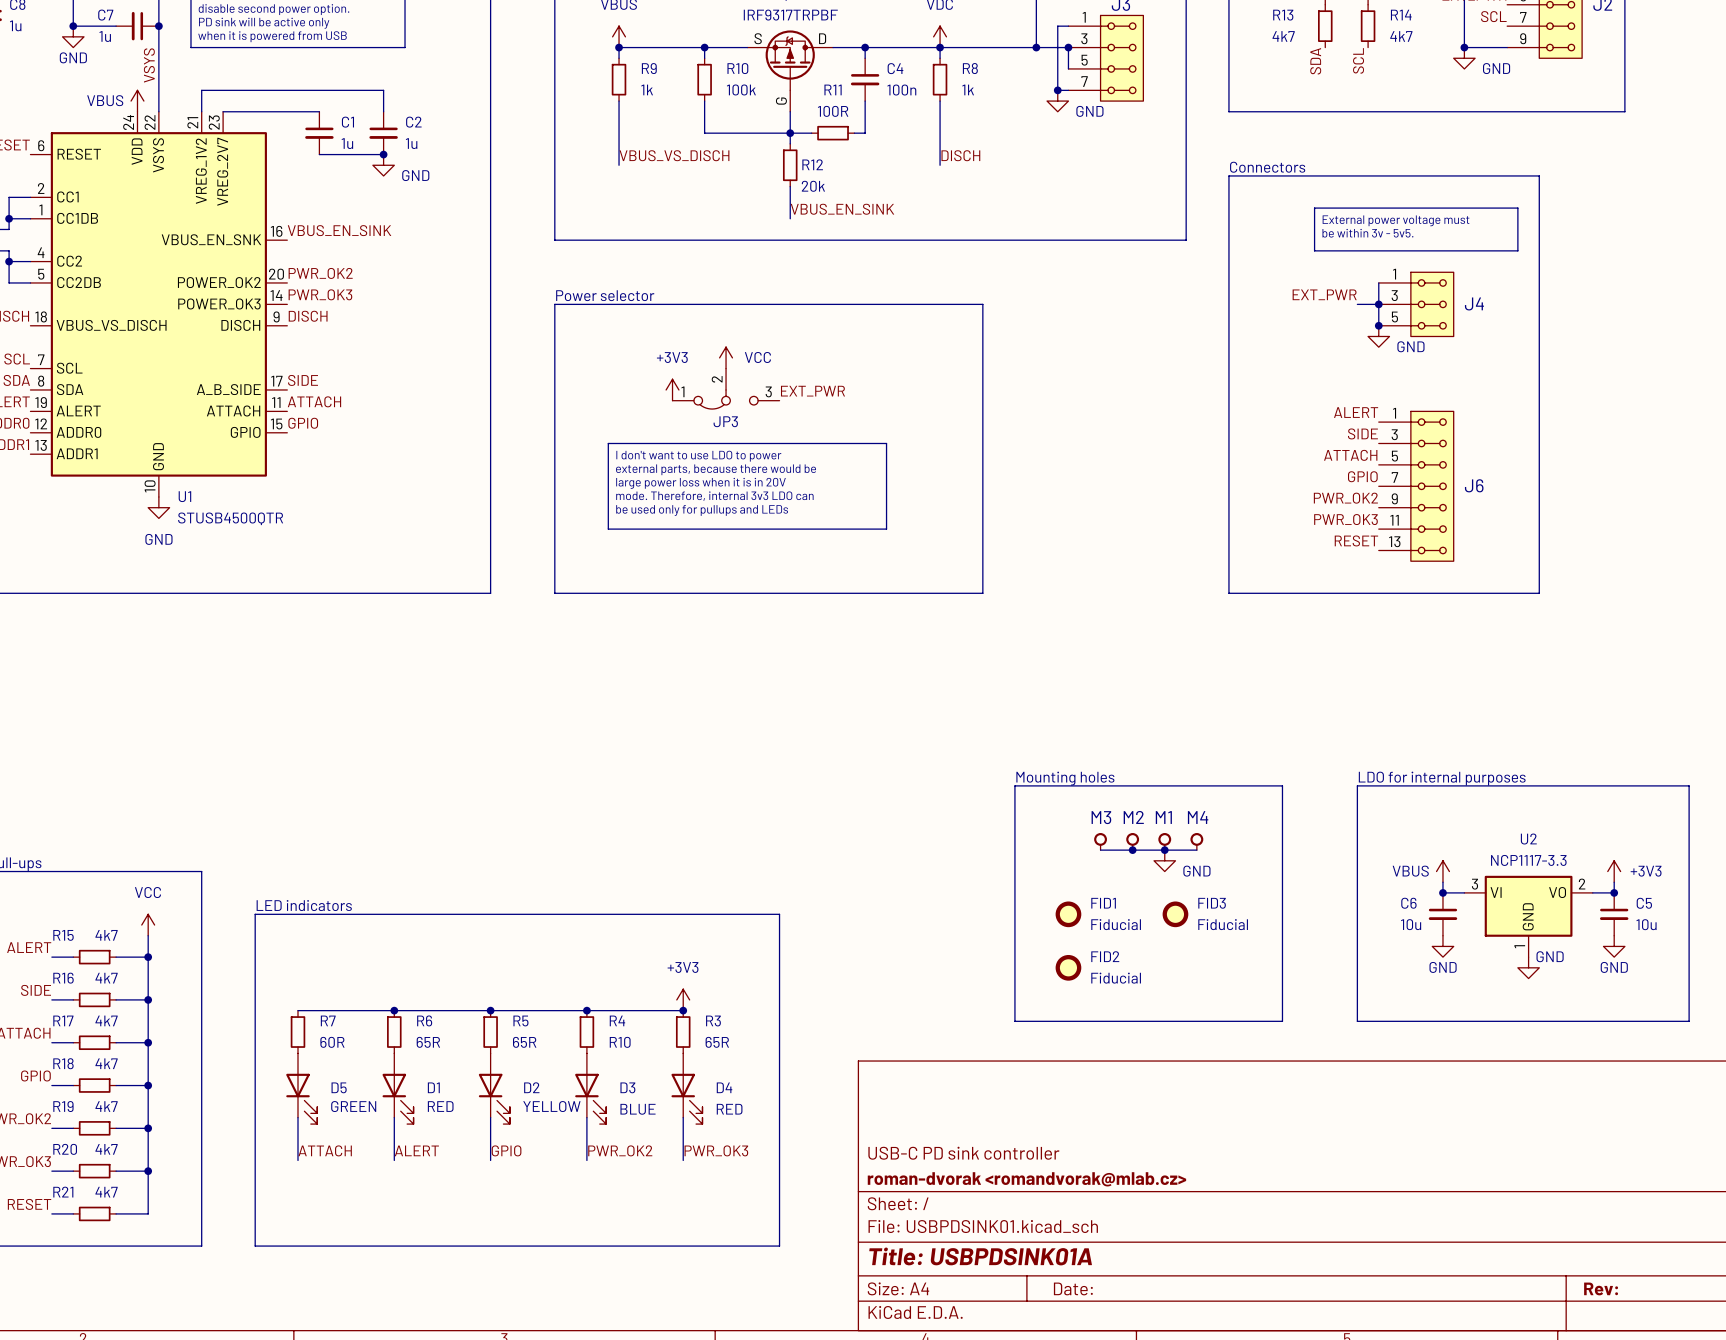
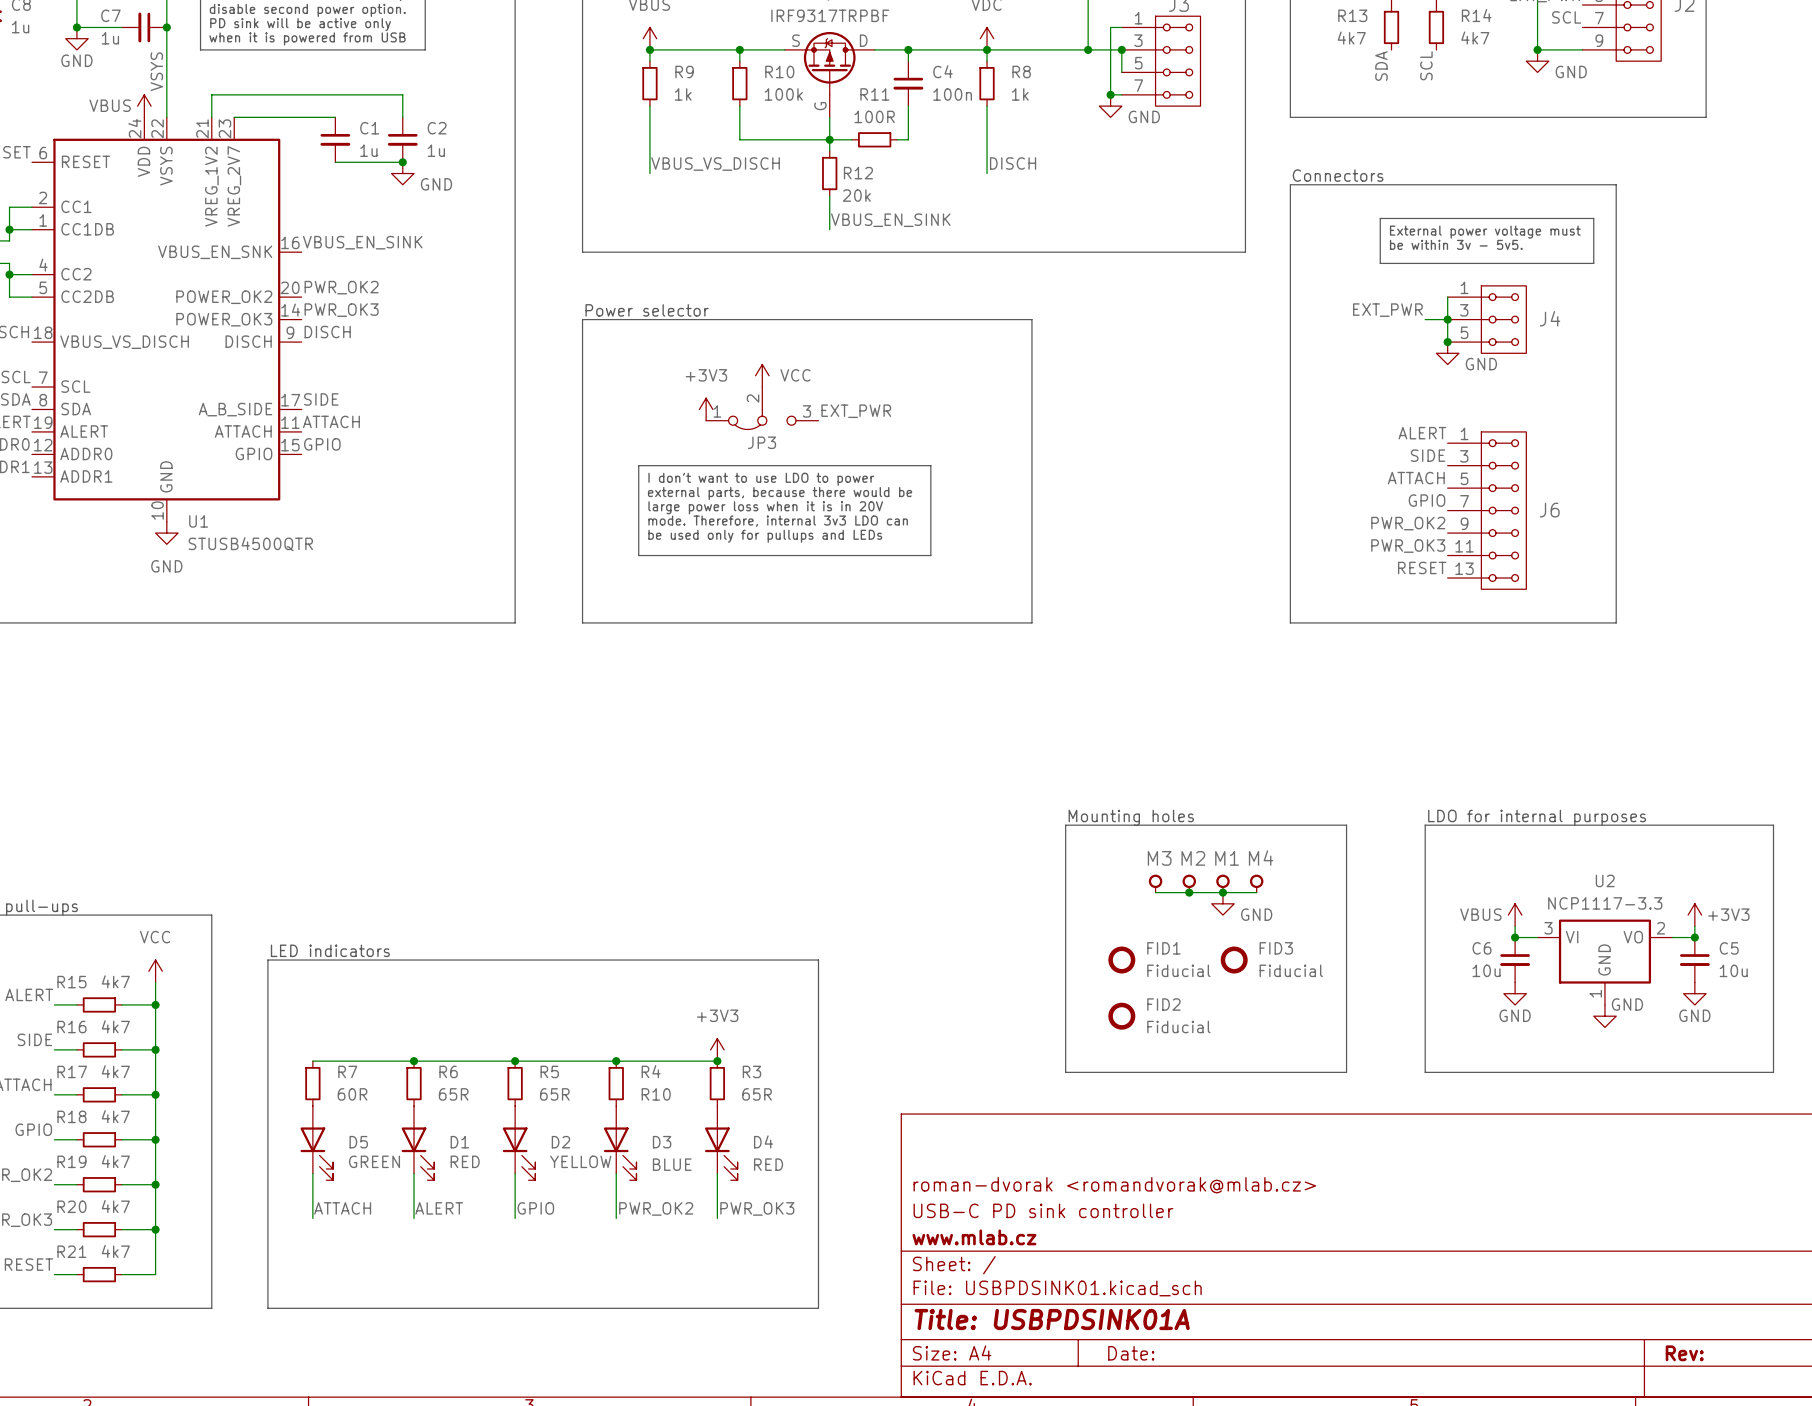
title block: none -> roman-dvorak <romandvorak@mlab.cz> (1114, 1185)
title block: roman-dvorak <romandvorak@mlab.cz> (1026, 1179) -> www.mlab.cz (974, 1237)

